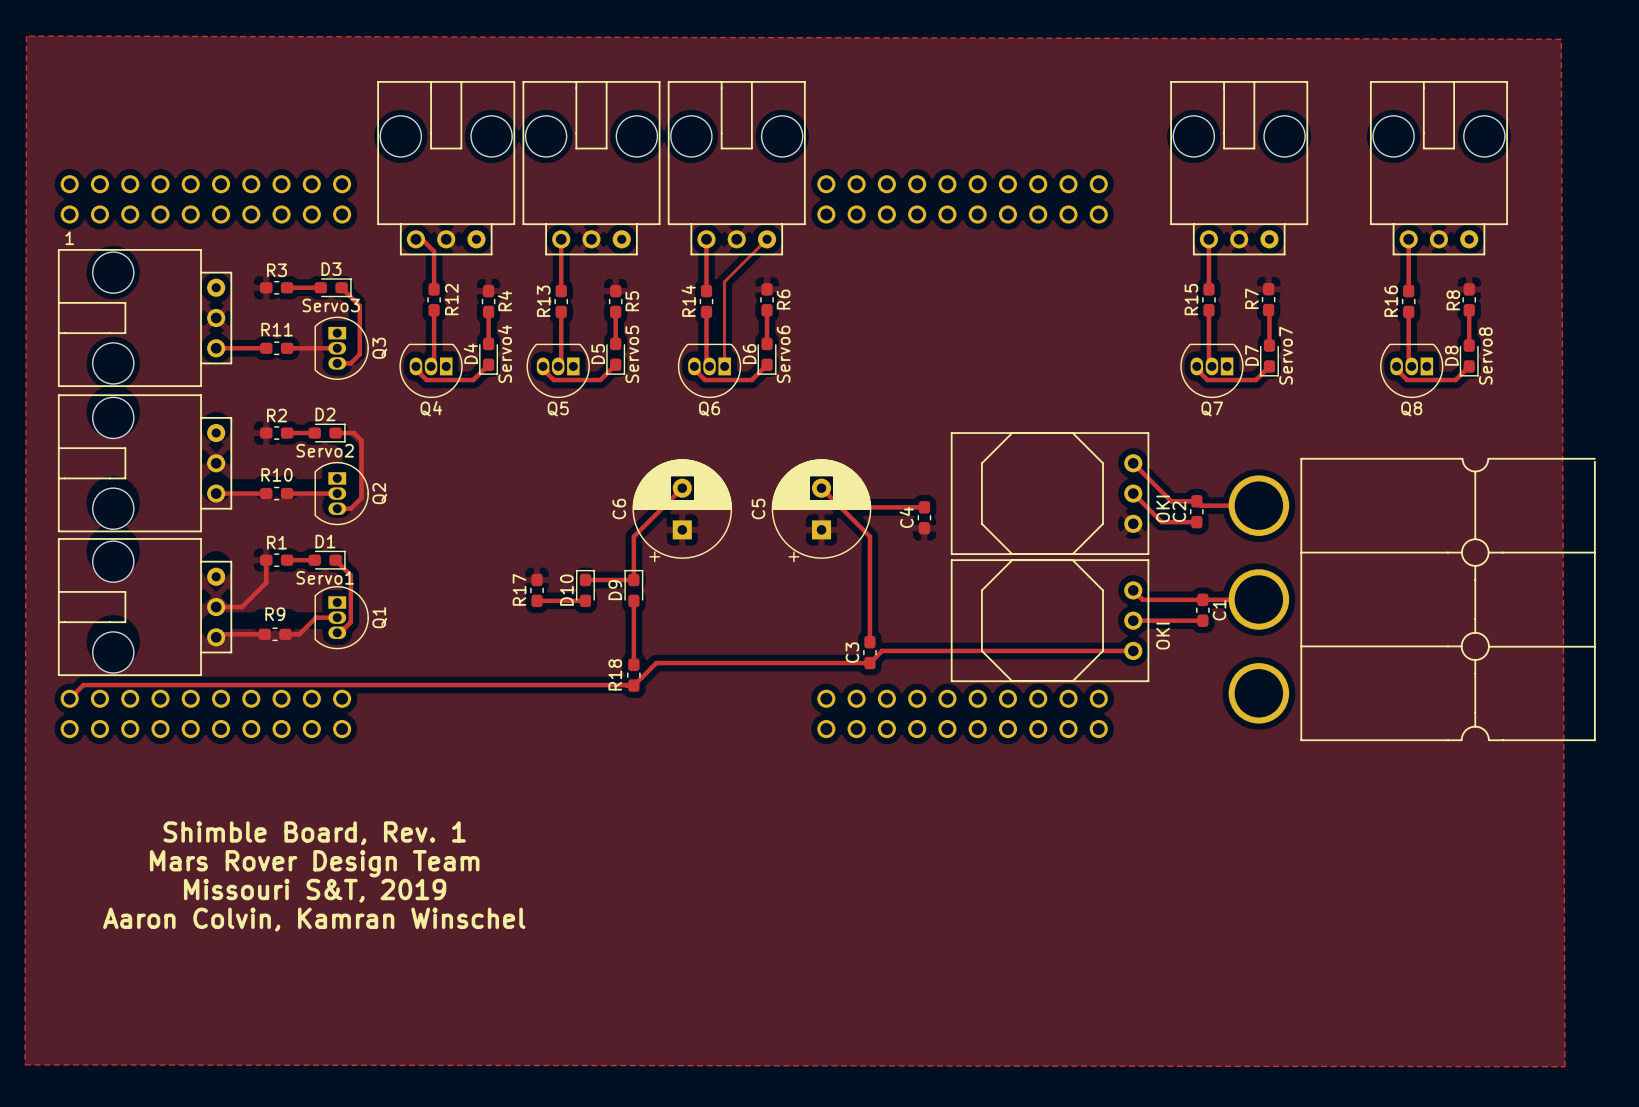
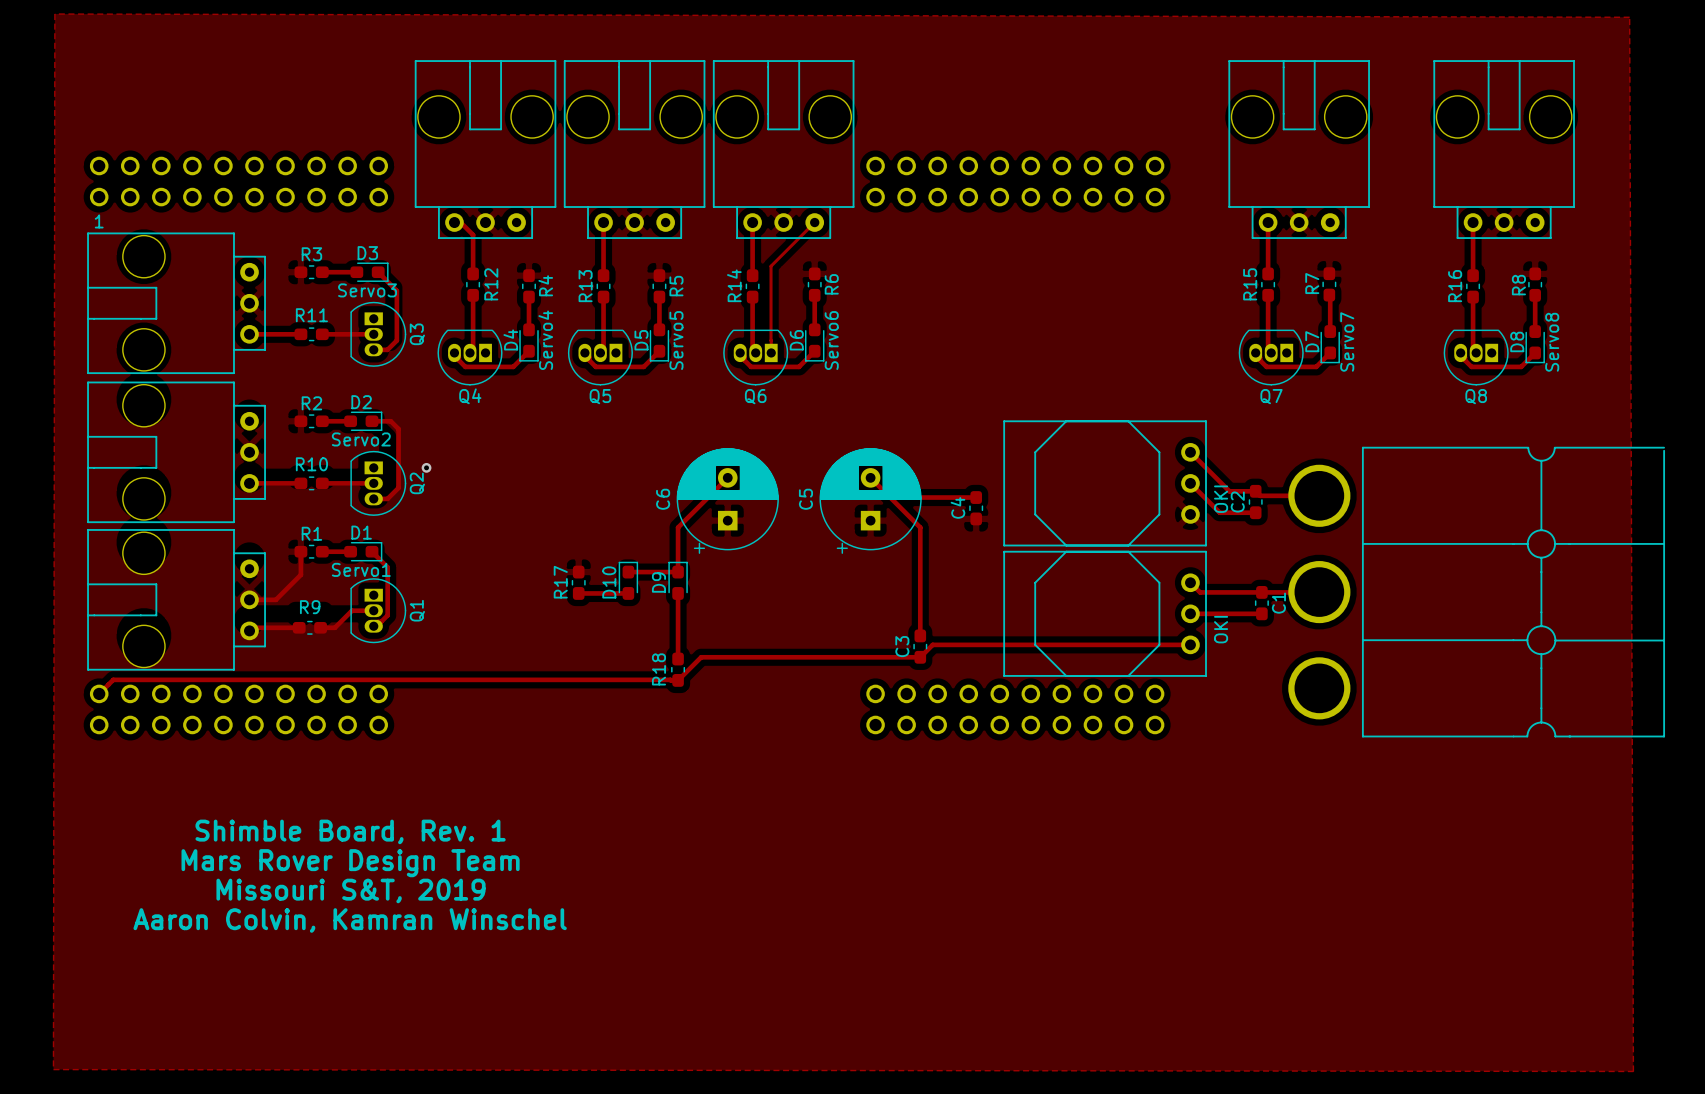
via: none -> (426, 467)

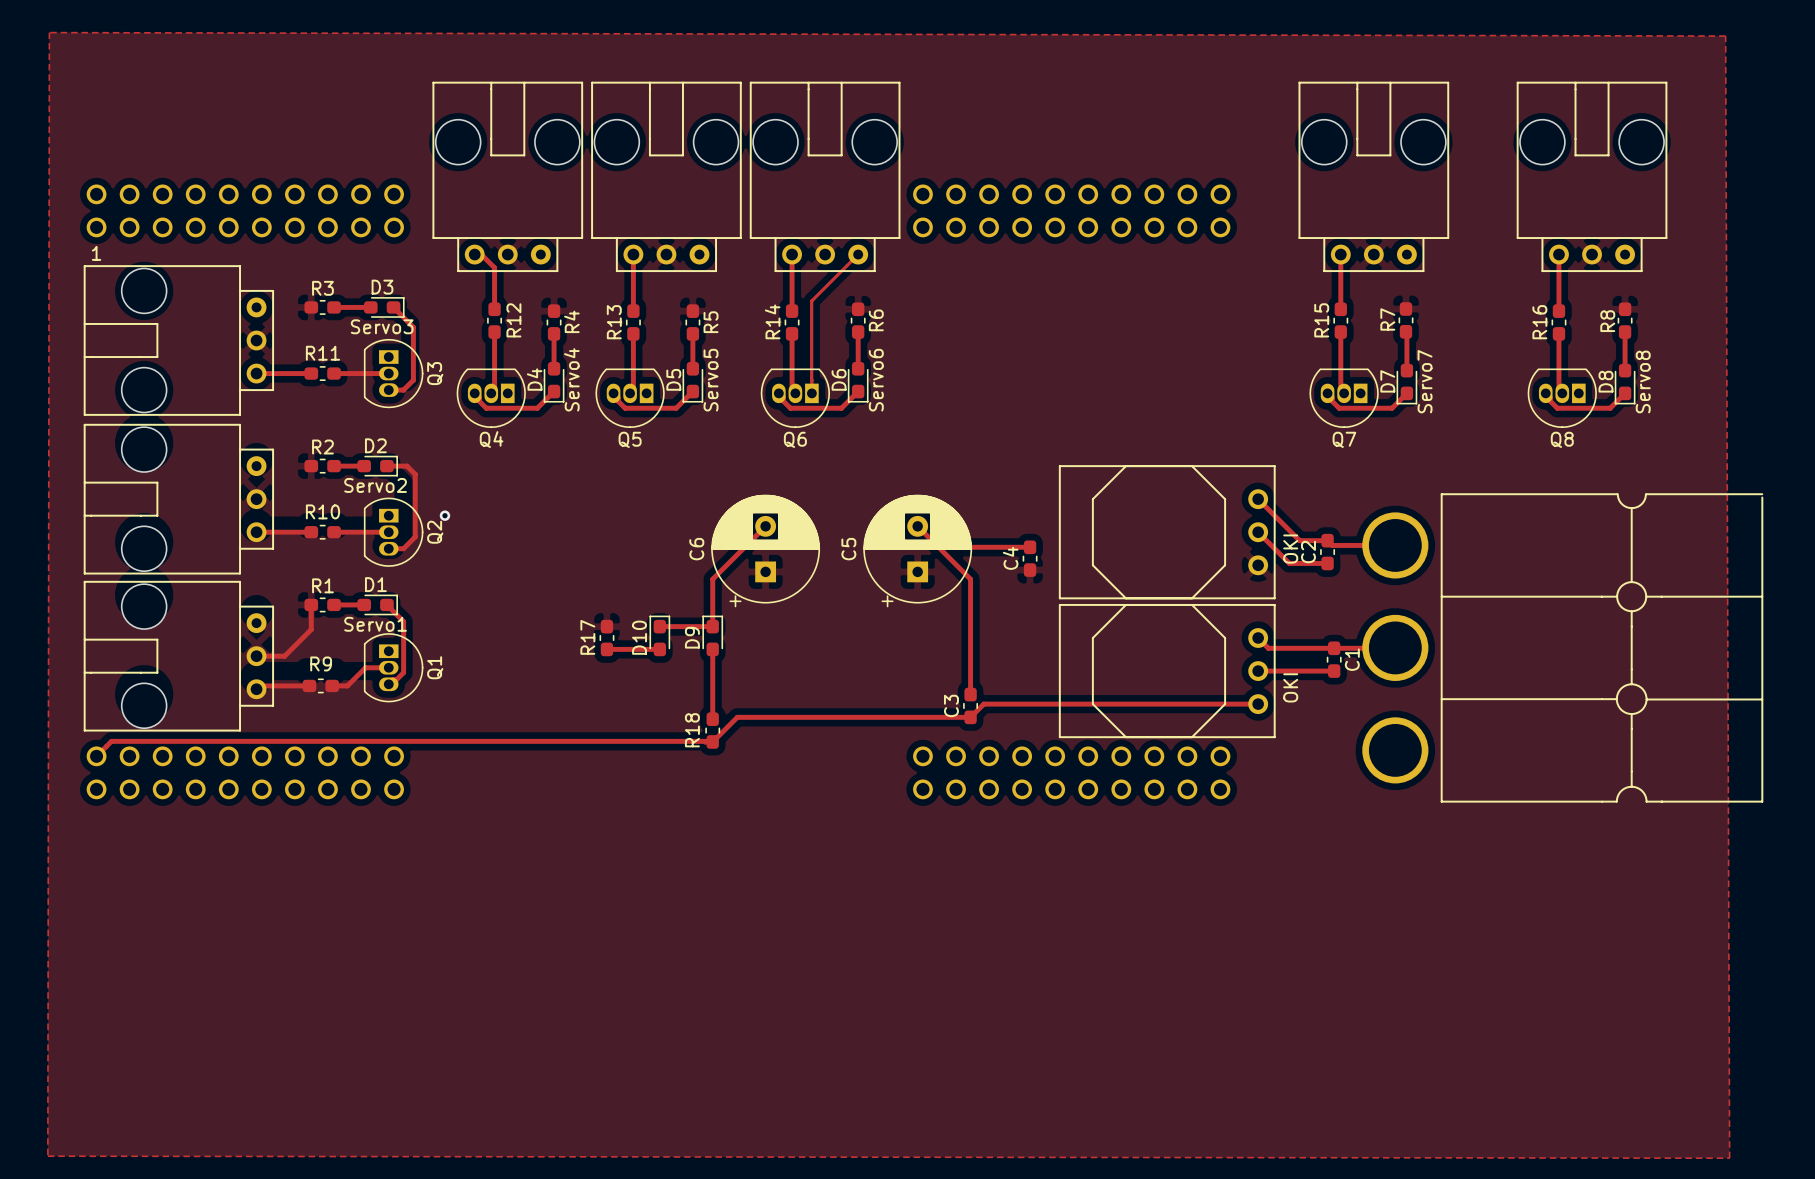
text: Shimble Board, Rev. 1 (350, 831) -> none
text: Mars Rover Design Team (350, 863) -> none
text: Missouri S&T, 2019 (351, 890) -> none
text: Aaron Colvin, Kamran Winschel (350, 920) -> none

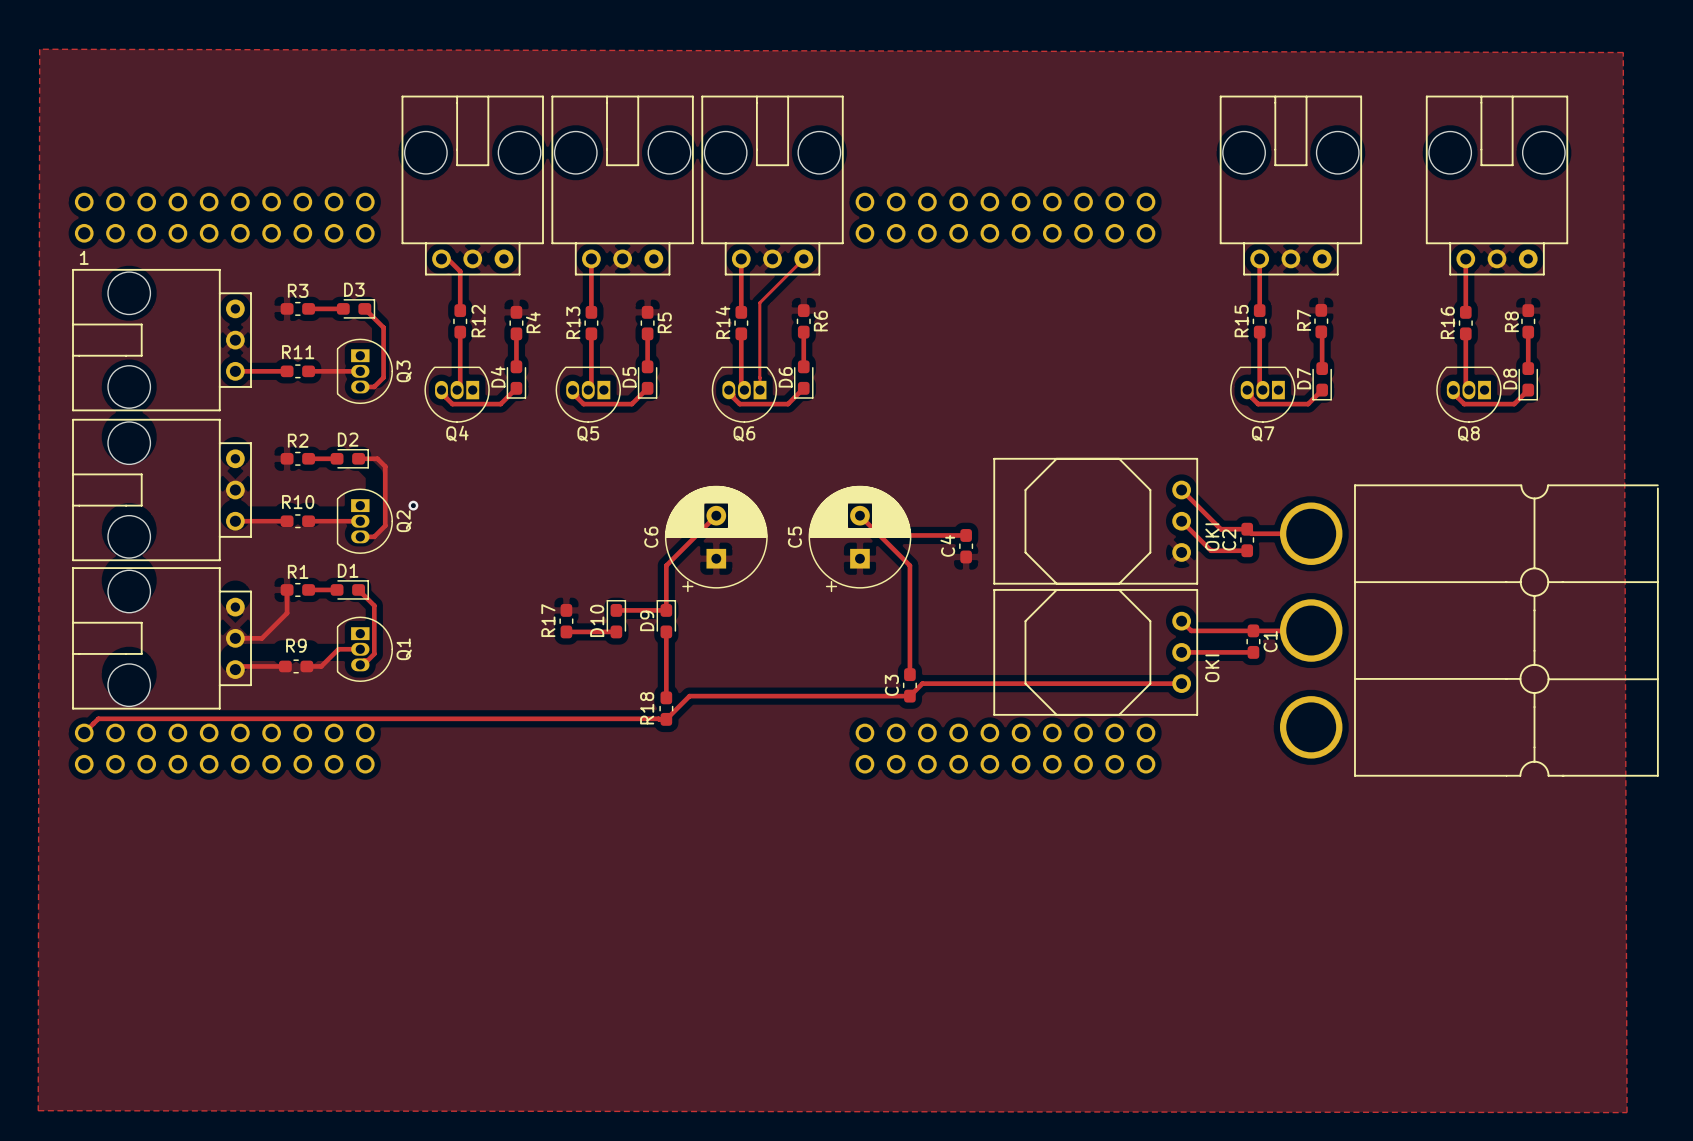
D3 value: Servo3 (382, 326) -> none
D4 value: Servo4 (571, 379) -> none
D5 value: Servo5 (711, 380) -> none
D6 value: Servo6 (876, 380) -> none
D7 value: Servo7 (1425, 381) -> none
D8 value: Servo8 (1643, 382) -> none
D2 value: Servo2 (375, 485) -> none
D1 value: Servo1 (375, 624) -> none

